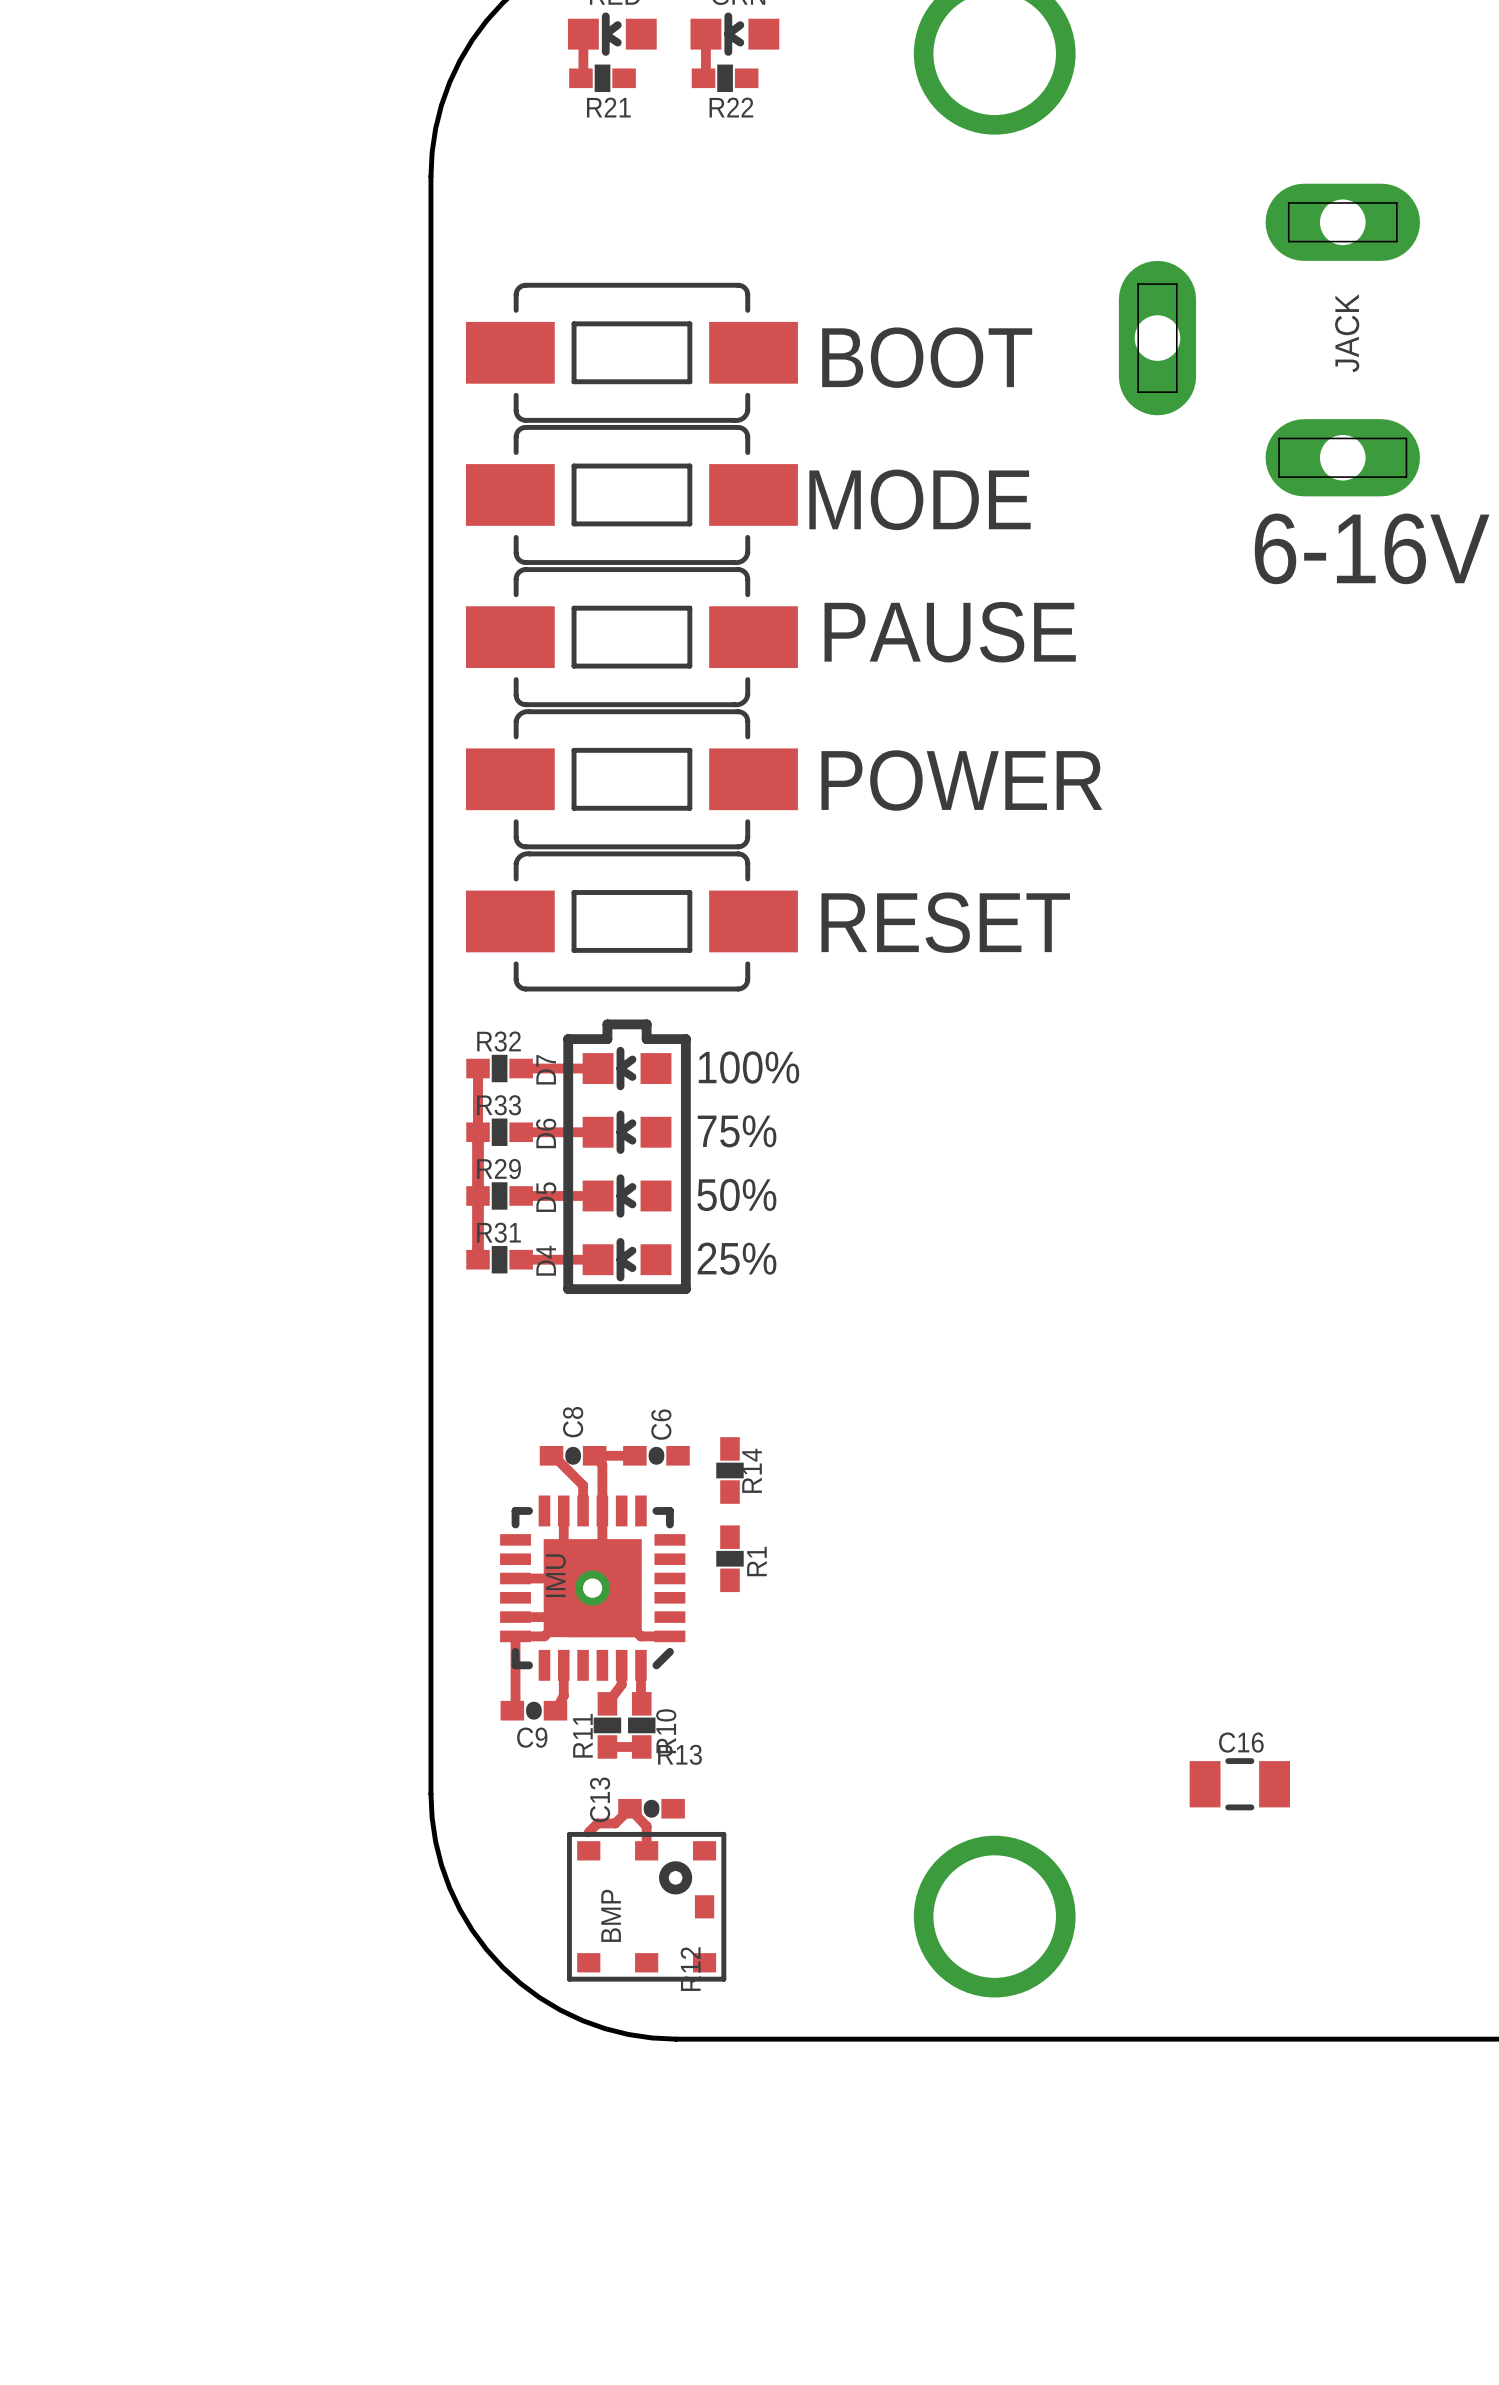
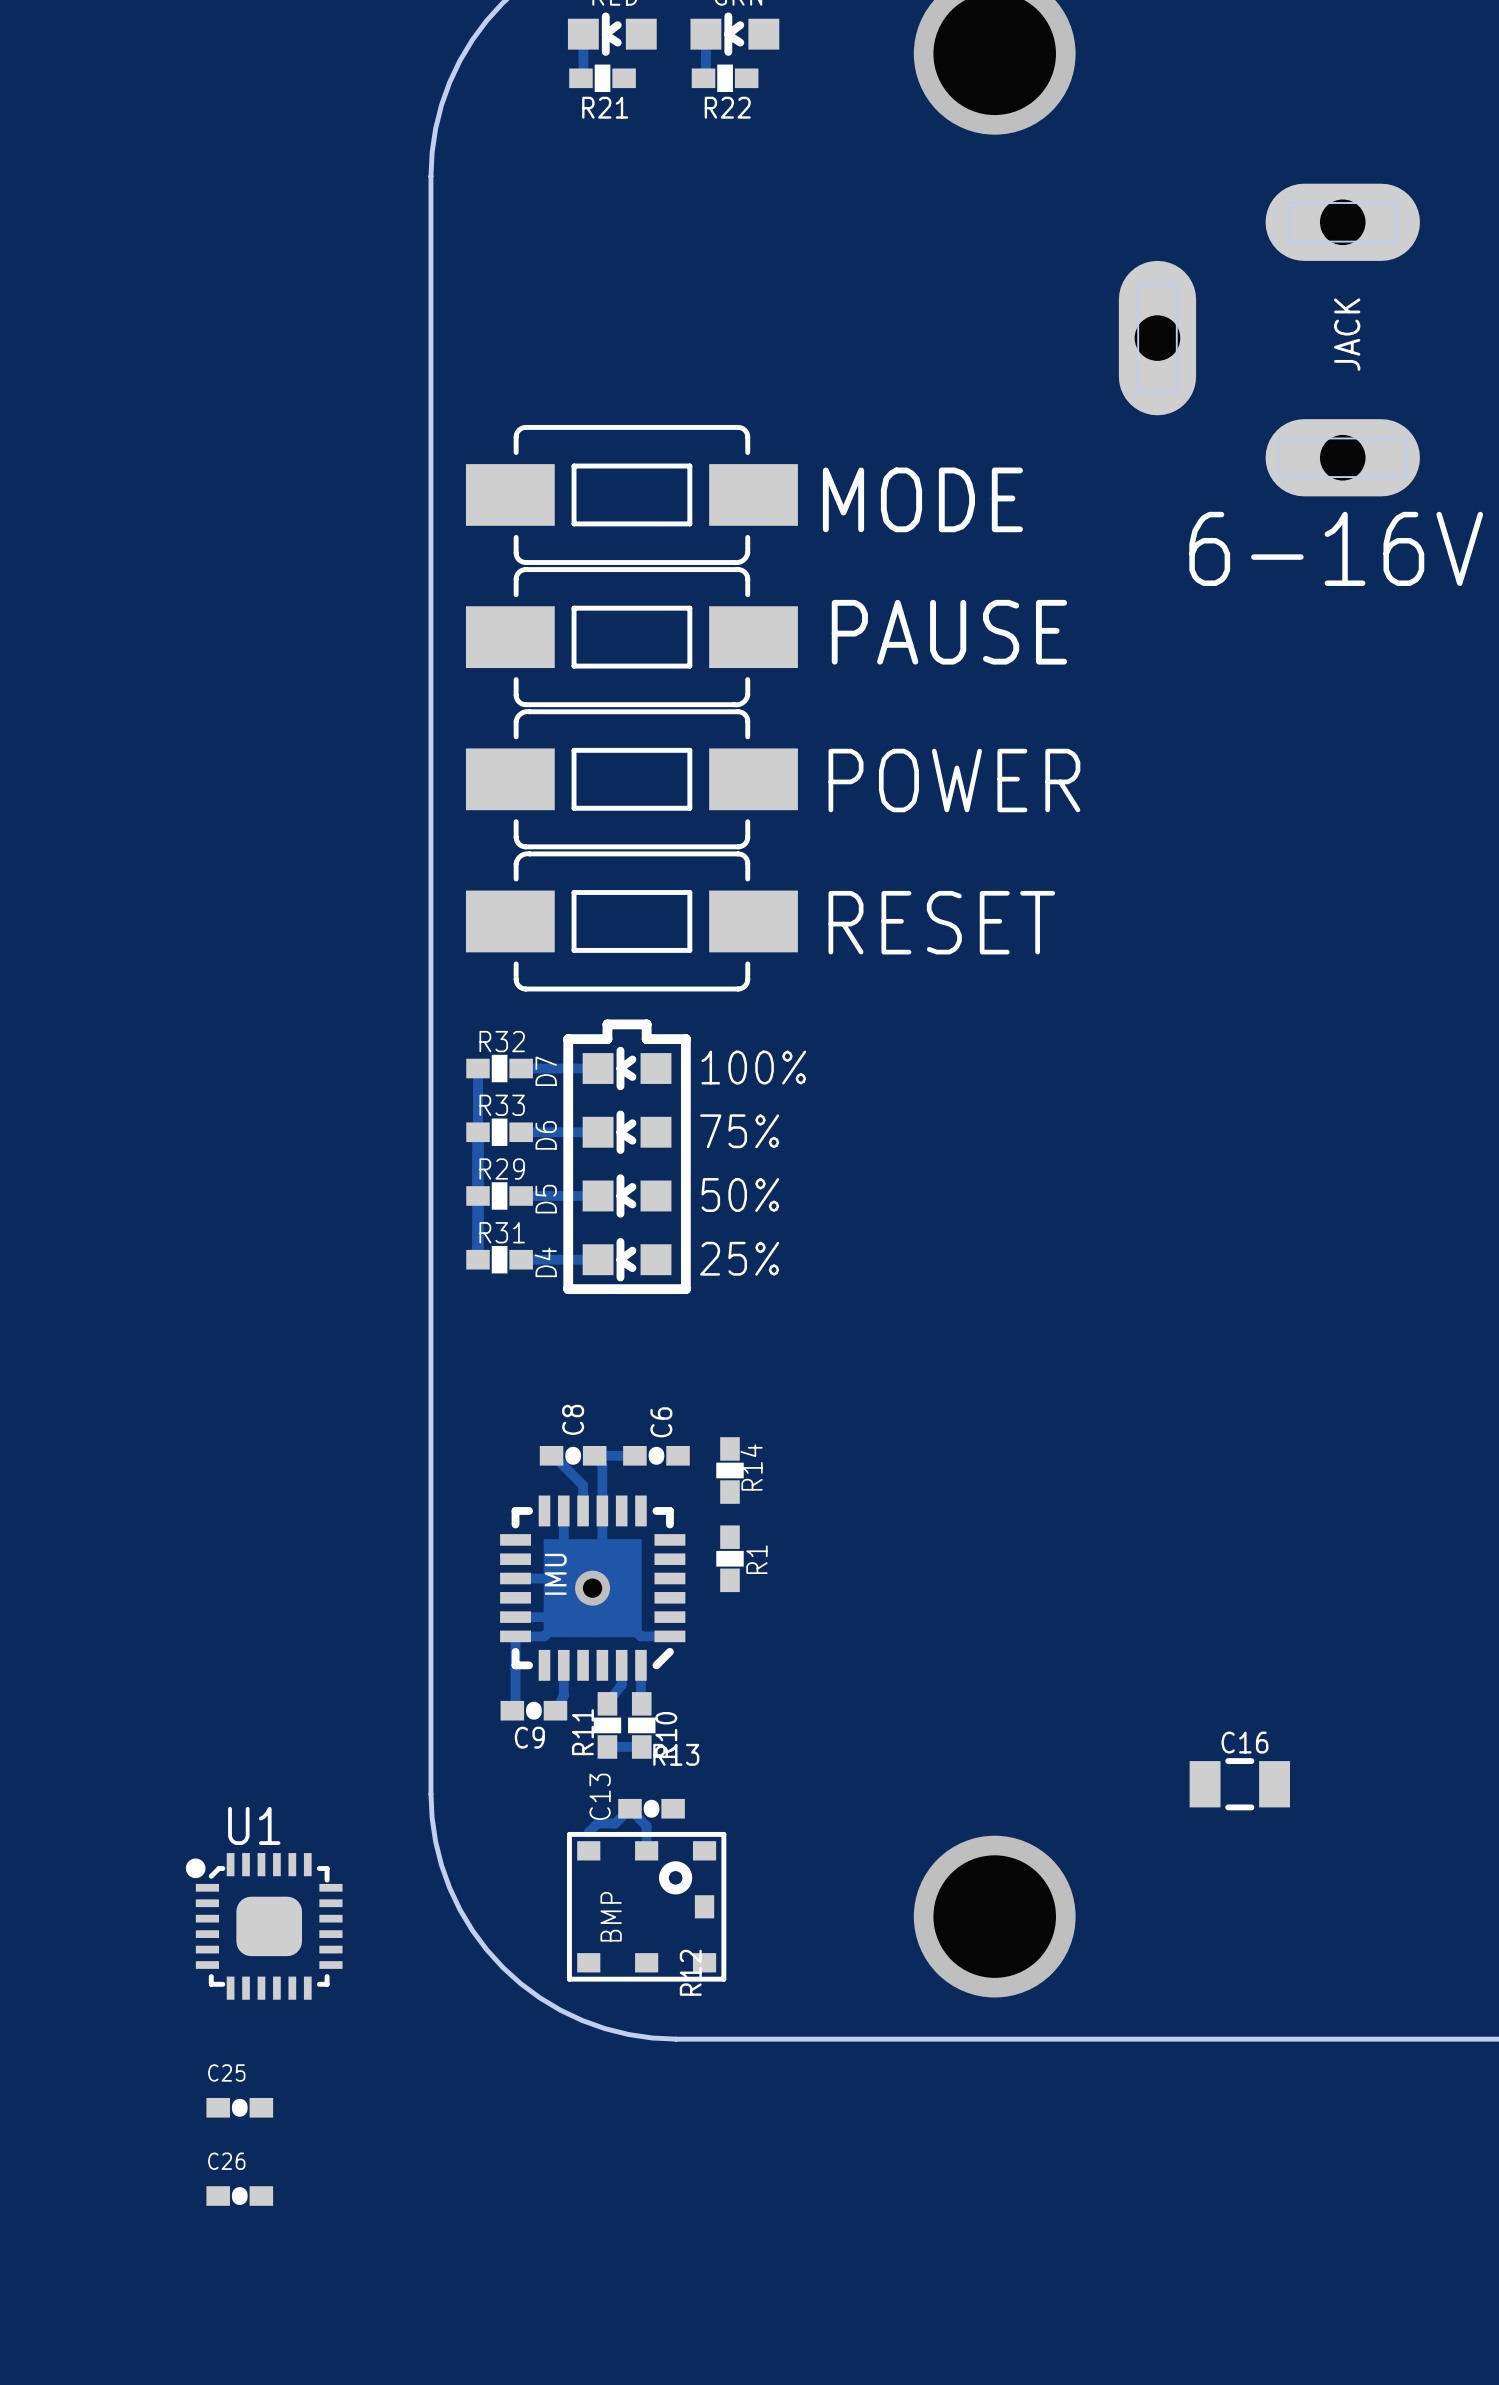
BOOT: (631, 352) -> none
U1: none -> (264, 1926)
C25: none -> (239, 2107)
C26: none -> (239, 2196)

